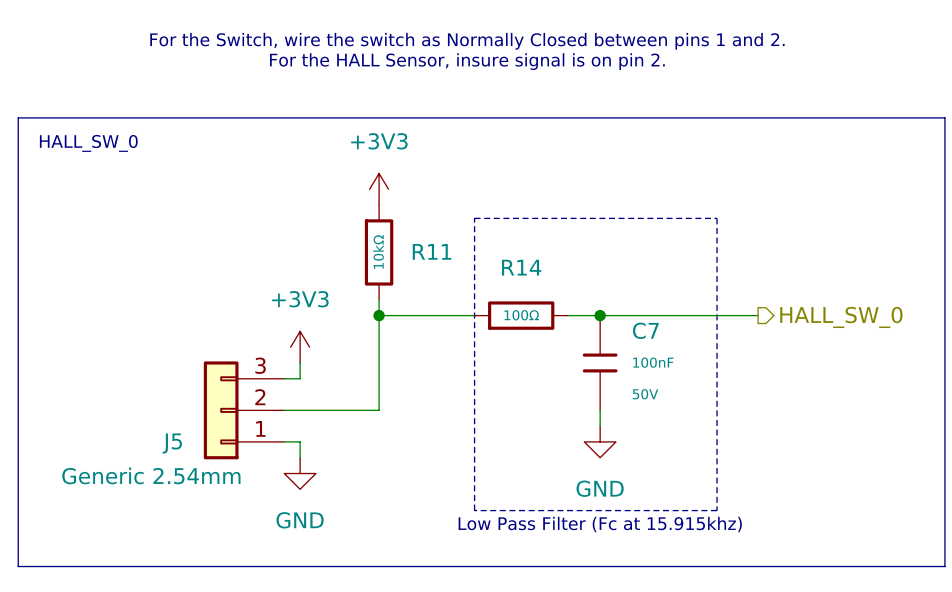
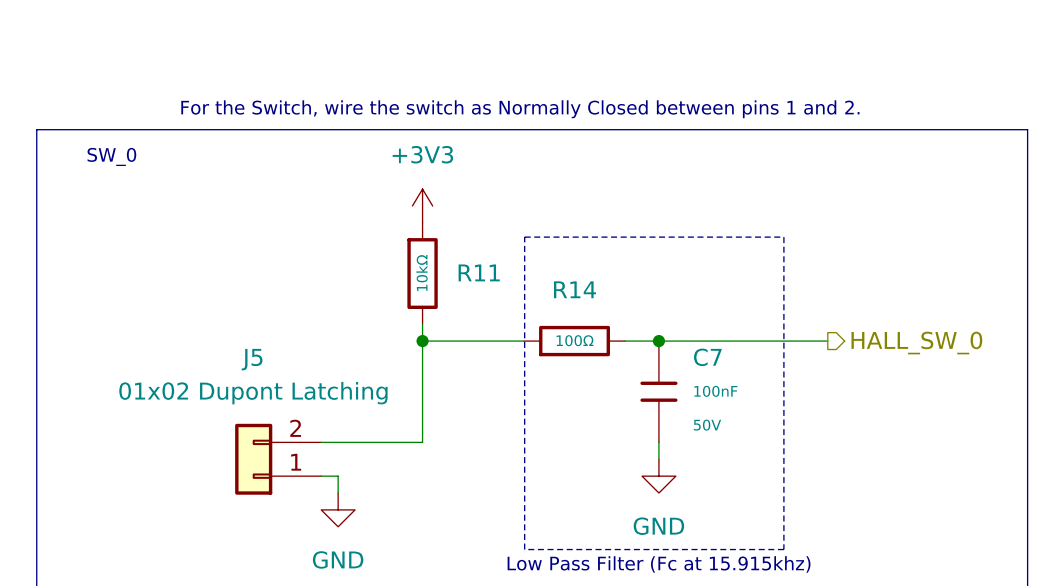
text position: For the Switch, wire the switch as Normally Closed between pins 1 and 2. (467, 41) -> For the Switch, wire the switch as Normally Closed between pins 1 and 2. (520, 109)
text: For the HALL Sensor, insure signal is on pin 2. (467, 61) -> none
text: HALL_SW_0 (88, 143) -> SW_0 (111, 156)
power symbol: +3V3 (300, 347) -> none
J5 symbol: [203, 361, 285, 460] -> [235, 423, 322, 495]
wire: (300, 362) (300, 378) (284, 378) -> none
J5 name position: J5 (172, 443) -> J5 (252, 359)
J5 value: Generic 2.54mm (151, 475) -> 01x02 Dupont Latching (253, 393)

